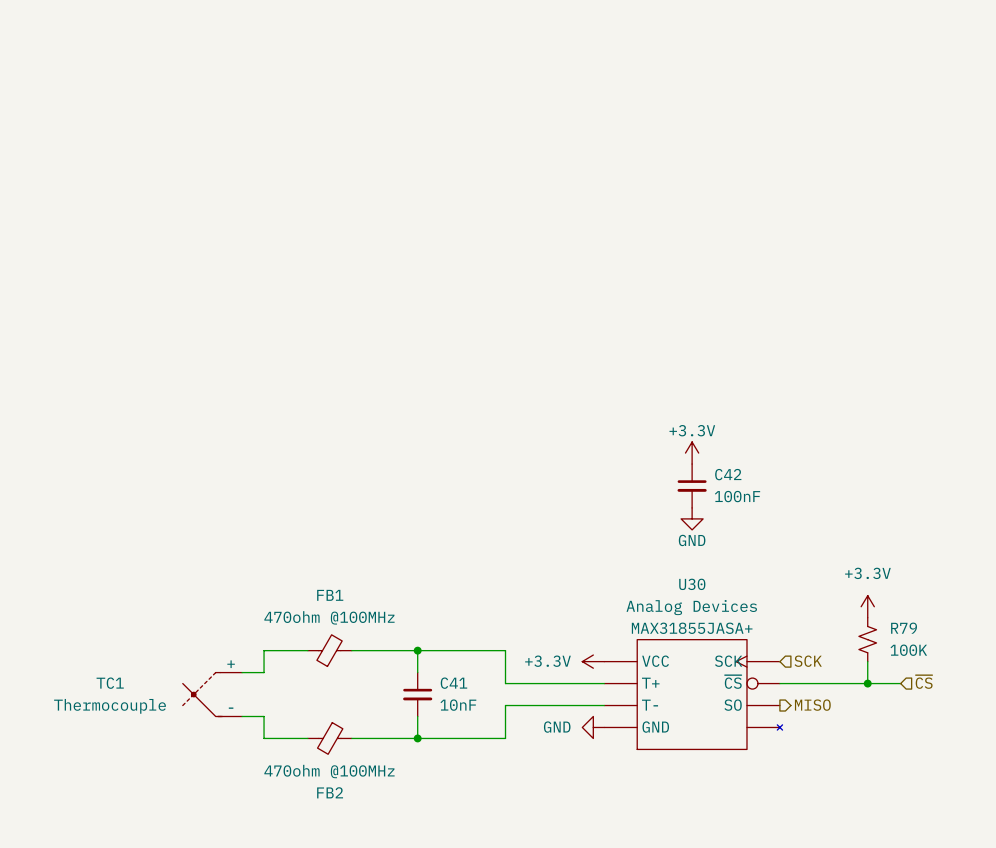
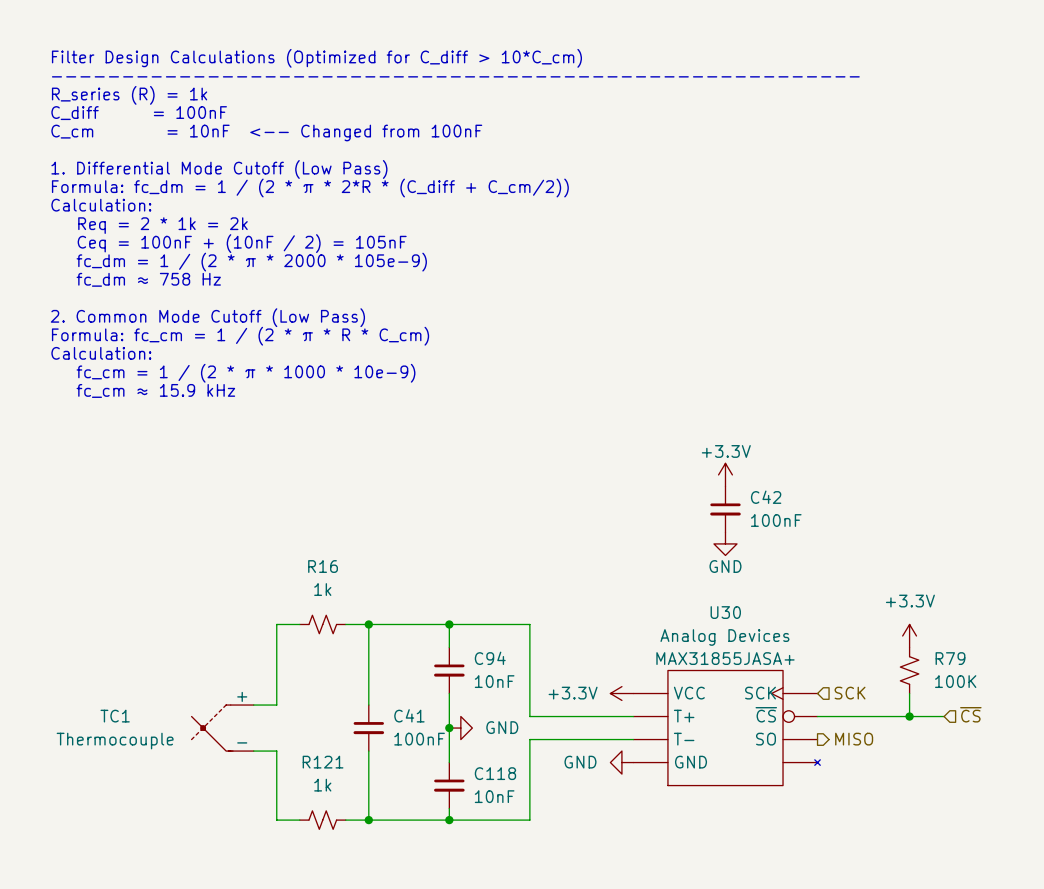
text: none -> Filter Design Calculations (Optimized for C_diff > 10*C_cm) (316, 58)
text: none -> --------------------------------------------------------- (455, 76)
text: none -> R_series (R) = 1k (129, 95)
text: none -> C_diff = 100nF (139, 113)
text: none -> C_cm = 10nF <-- Changed from 100nF (266, 132)
text: none -> 1. Differential Mode Cutoff (Low Pass) (219, 169)
text: none -> Formula: fc_dm = 1 / (2 * π * 2*R * (C_diff + C_cm/2)) (310, 188)
text: none -> Calculation: (101, 205)
text: none -> Req = 2 * 1k = 2k (162, 225)
text: none -> Ceq = 100nF + (10nF / 2) = 105nF (242, 243)
text: none -> fc_dm = 1 / (2 * π * 2000 * 105e-9) (251, 262)
text: none -> fc_dm ≈ 758 Hz (148, 279)
text: none -> 2. Common Mode Cutoff (Low Pass) (207, 317)
text: none -> Formula: fc_cm = 1 / (2 * π * R * C_cm) (240, 336)
text: none -> Calculation: (101, 353)
text: none -> fc_cm = 1 / (2 * π * 1000 * 10e-9) (245, 373)
text: none -> fc_cm ≈ 15.9 kHz (155, 390)
R16: none -> 1k (322, 624)
wire: none -> (368, 624) (368, 705)
junction: none -> (368, 624)
junction: none -> (449, 624)
C94: none -> 10nF (449, 670)
wire: (264, 650) (307, 650) -> (276, 682) (276, 624) (299, 624)
FB1: 470ohm @100MHz (329, 650) -> none
wire: (351, 650) (505, 650) -> (345, 624) (529, 624) (529, 682)
wire: (417, 650) (417, 672) -> (449, 624) (449, 647)
junction: (417, 650) -> none
wire: none -> (449, 693) (449, 762)
C41 position: (417, 694) -> (368, 728)
junction: none -> (449, 728)
power symbol: none -> GND (460, 728)
C41 value: 10nF (458, 705) -> 100nF (419, 739)
wire: none -> (368, 751) (368, 820)
wire: (417, 716) (417, 738) -> none
wire: (264, 738) (307, 738) -> (276, 774) (276, 820) (299, 820)
FB2: 470ohm @100MHz (329, 738) -> none
wire: (351, 738) (505, 738) -> (345, 820) (529, 820) (529, 774)
junction: (417, 738) -> none
C118: none -> 10nF (449, 785)
wire: none -> (449, 808) (449, 820)
R121: none -> 1k (322, 820)
junction: none -> (368, 820)
junction: none -> (449, 820)

